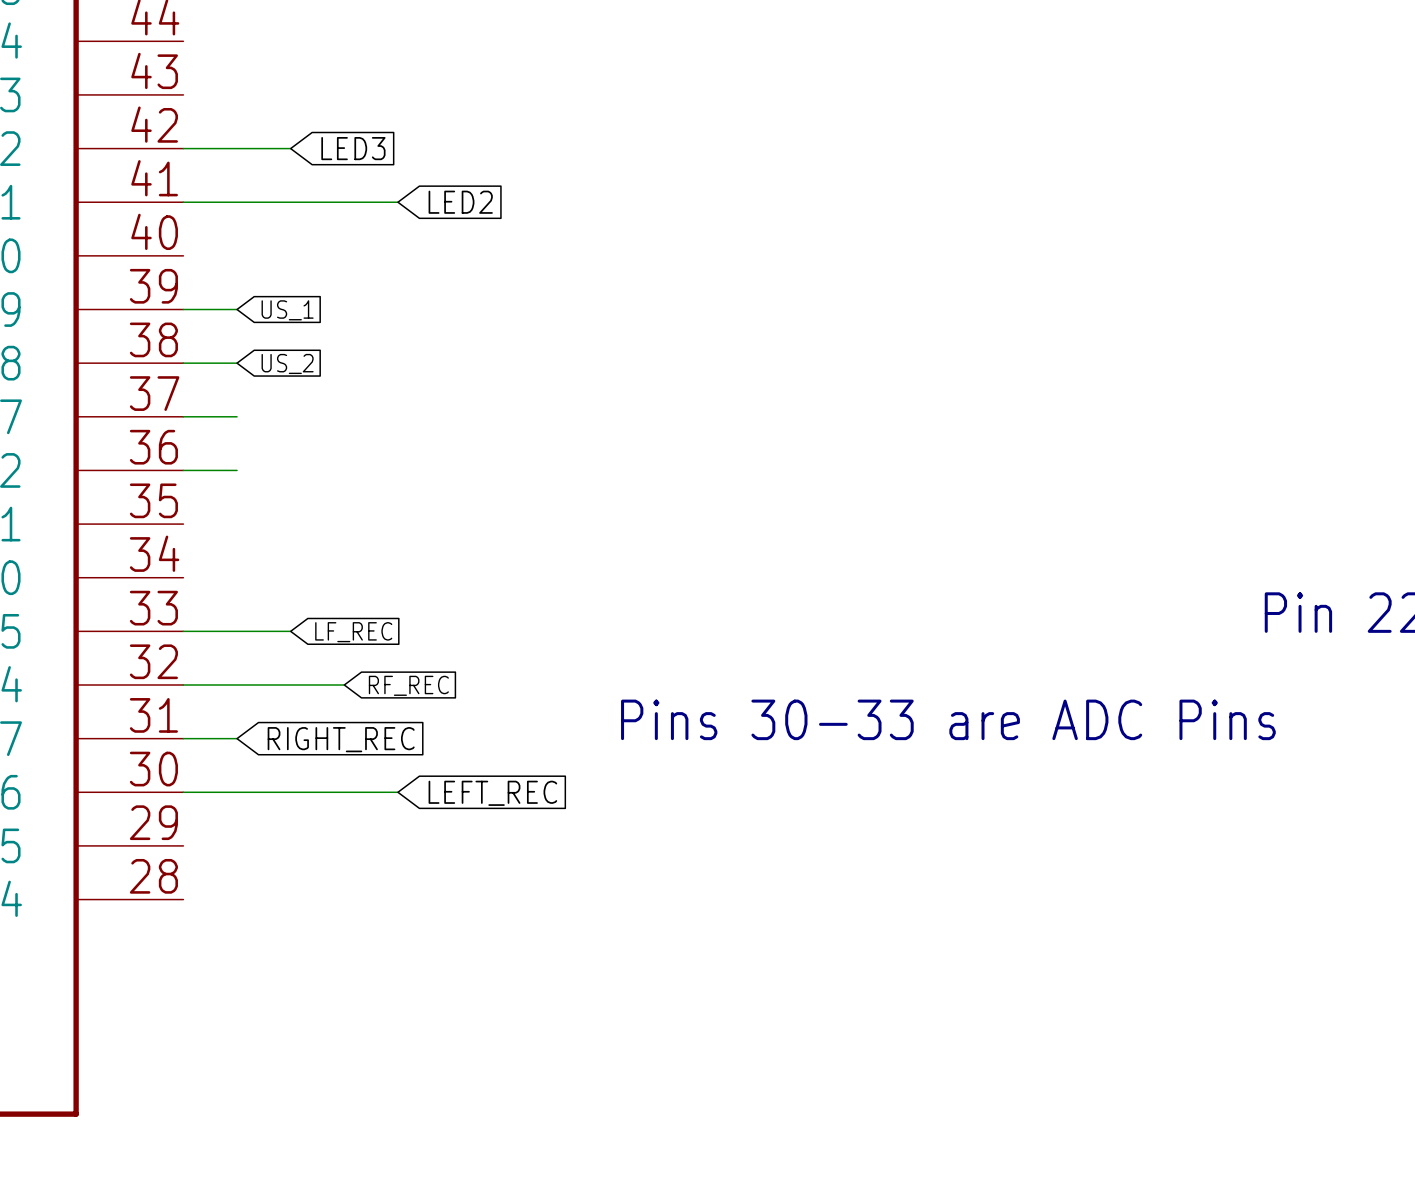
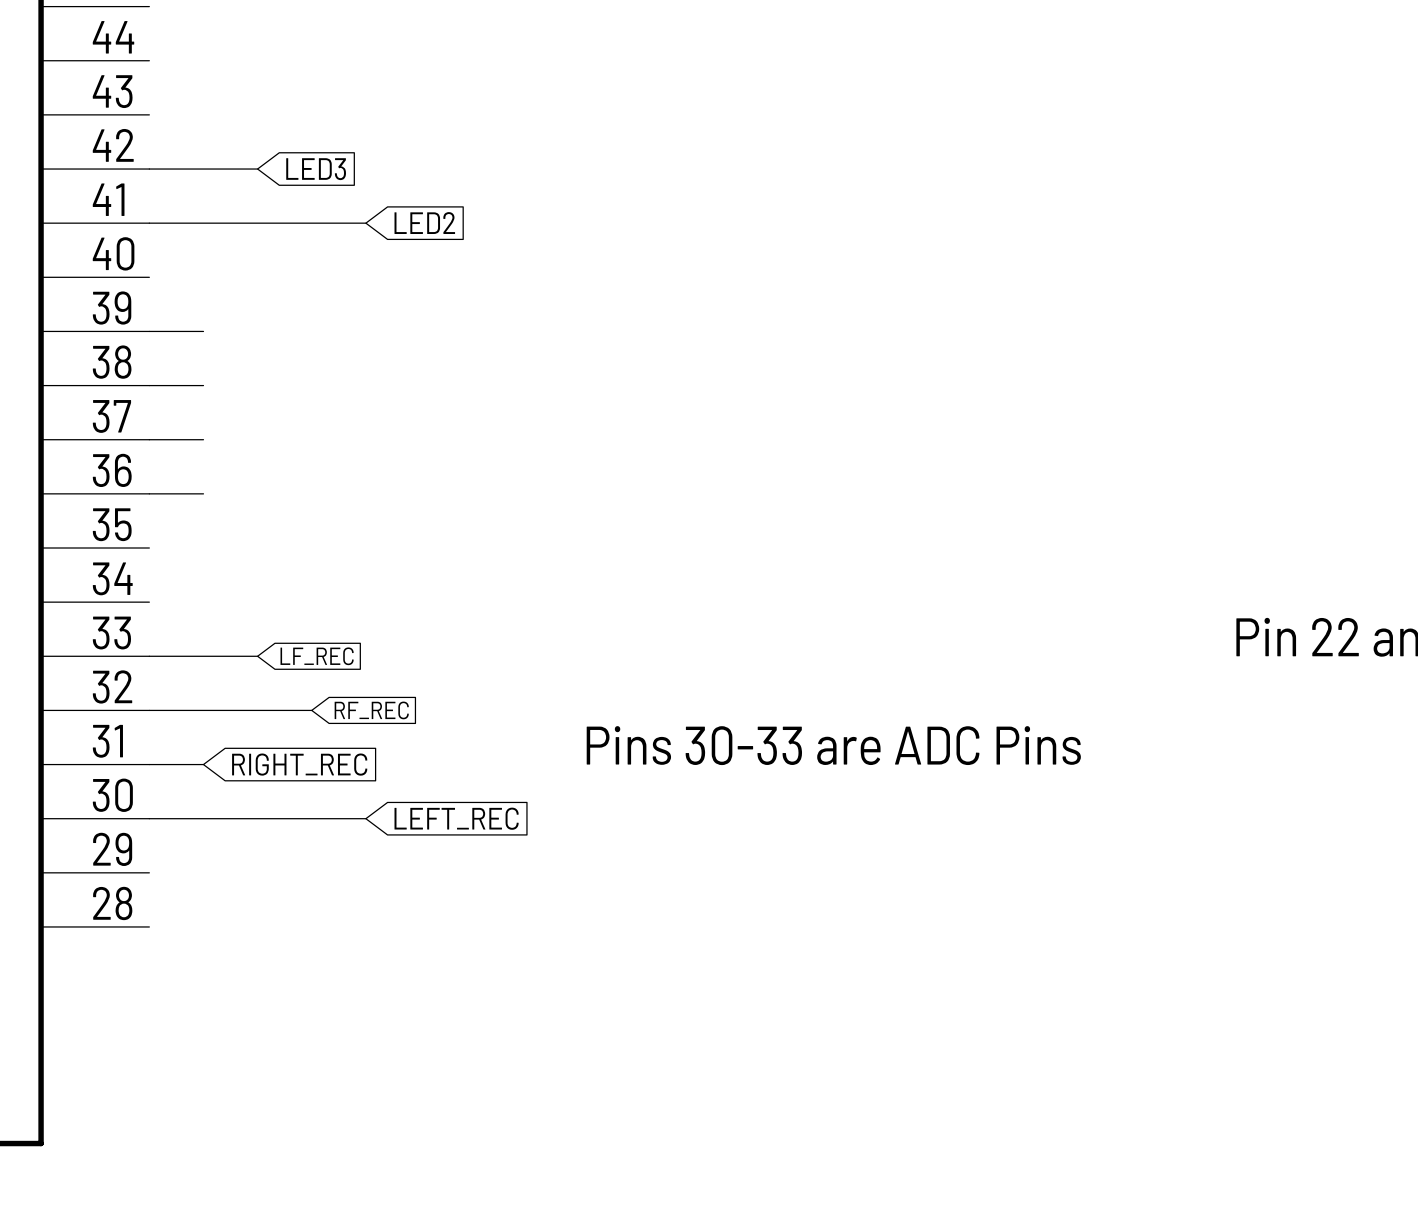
global label: US_1 (287, 310) -> none
global label: US_2 (287, 363) -> none

